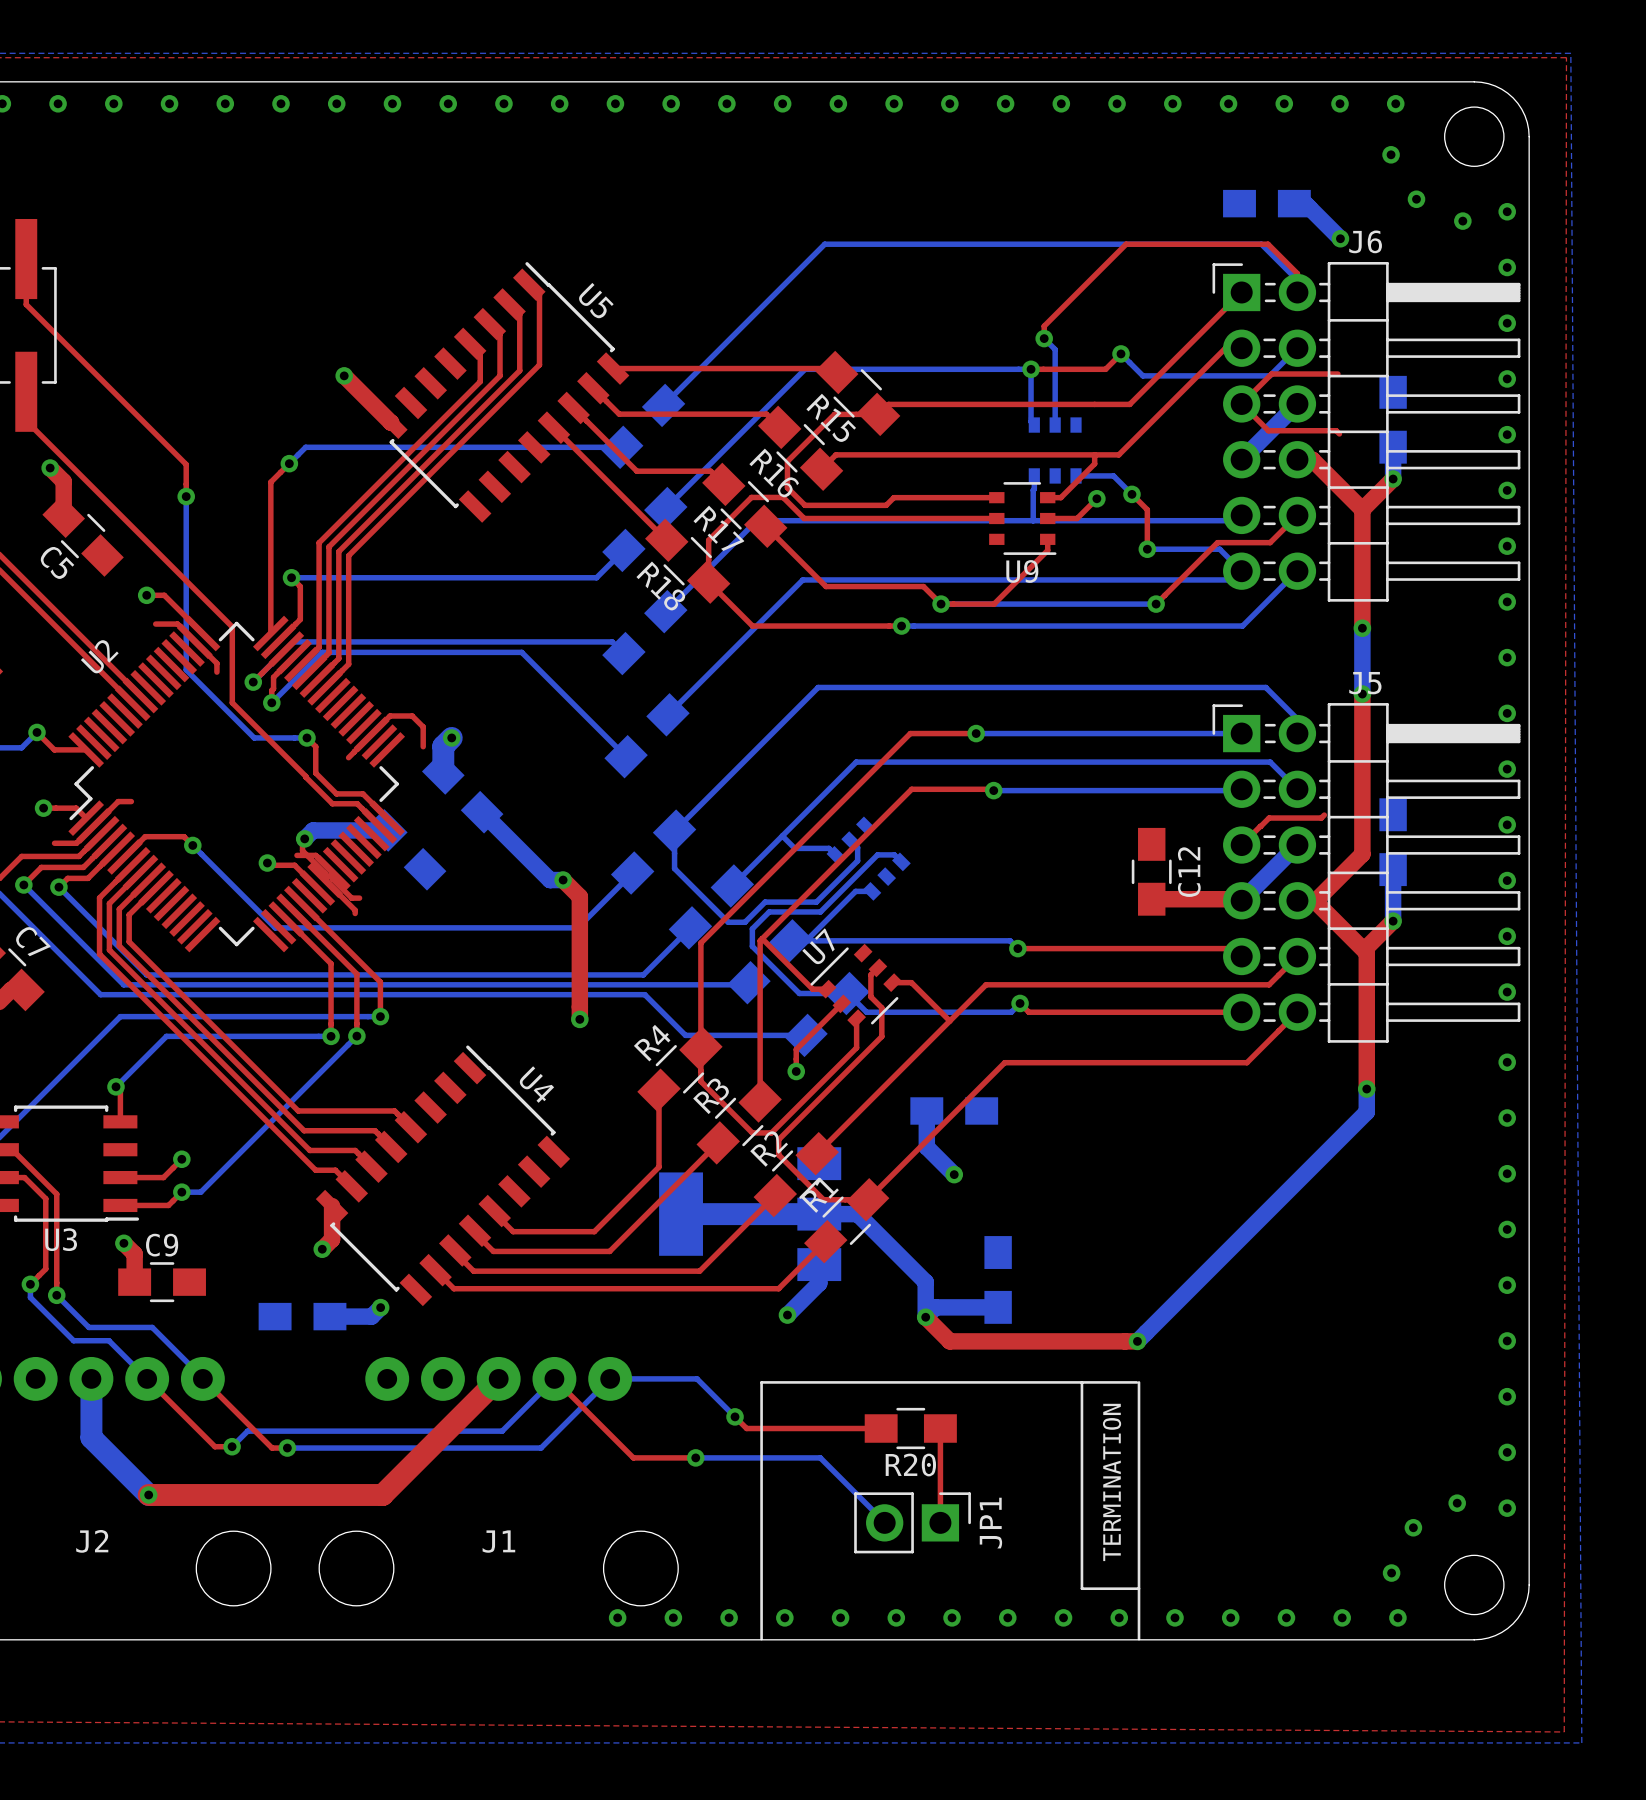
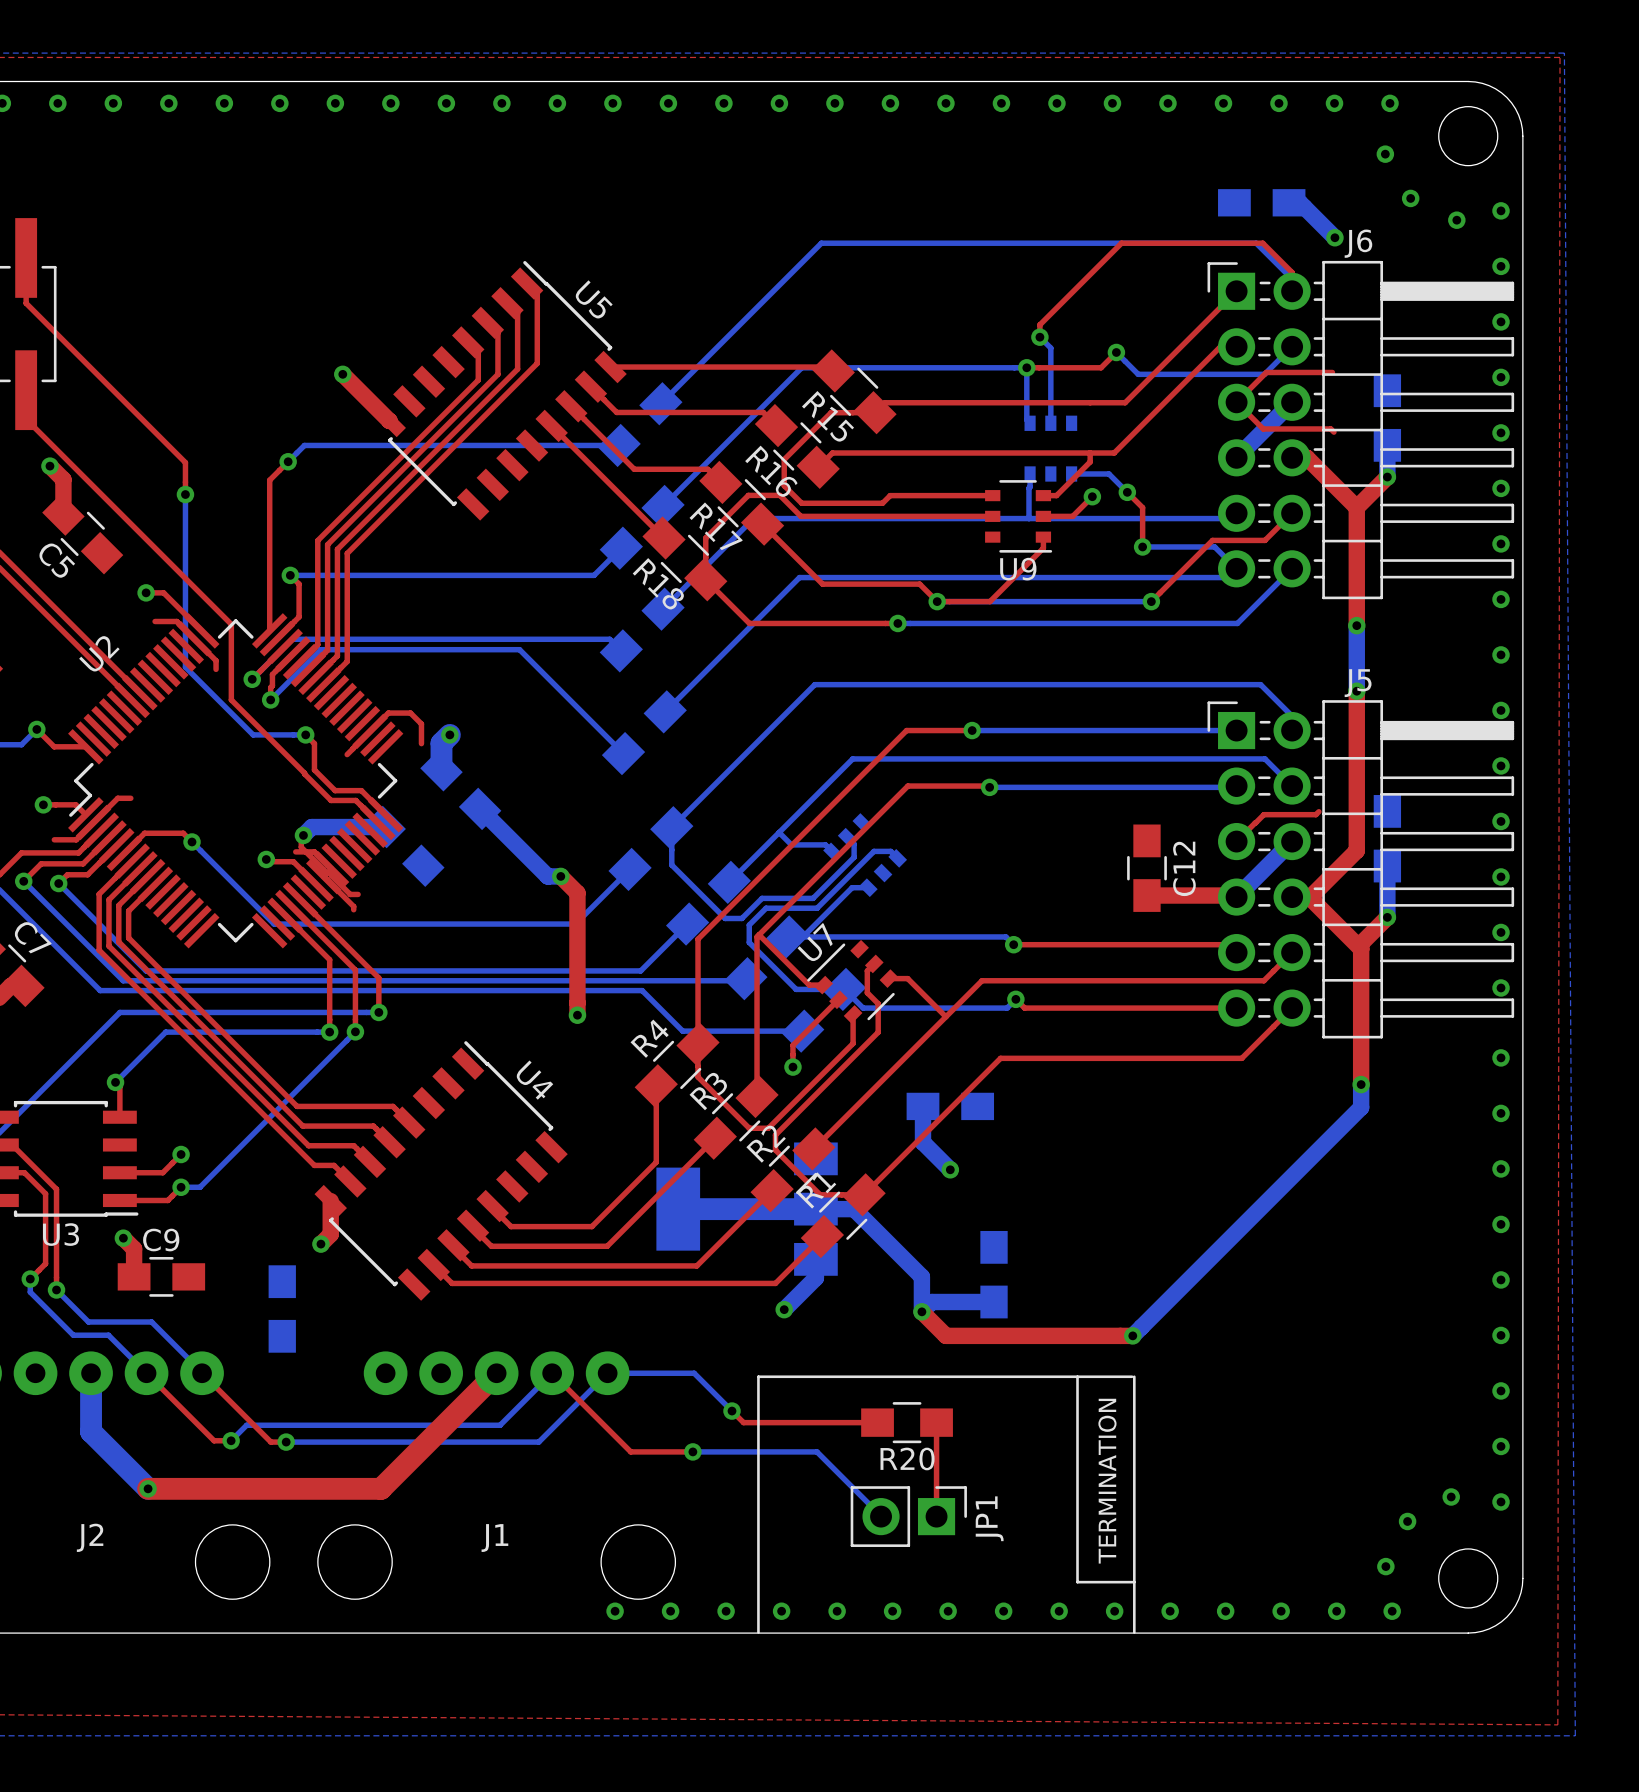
bottom track: (380, 1307) (371, 1316) (329, 1316) -> none
via: (380, 1307) -> none
part rotation: 0° (302, 1316) -> 90° clockwise (282, 1309)

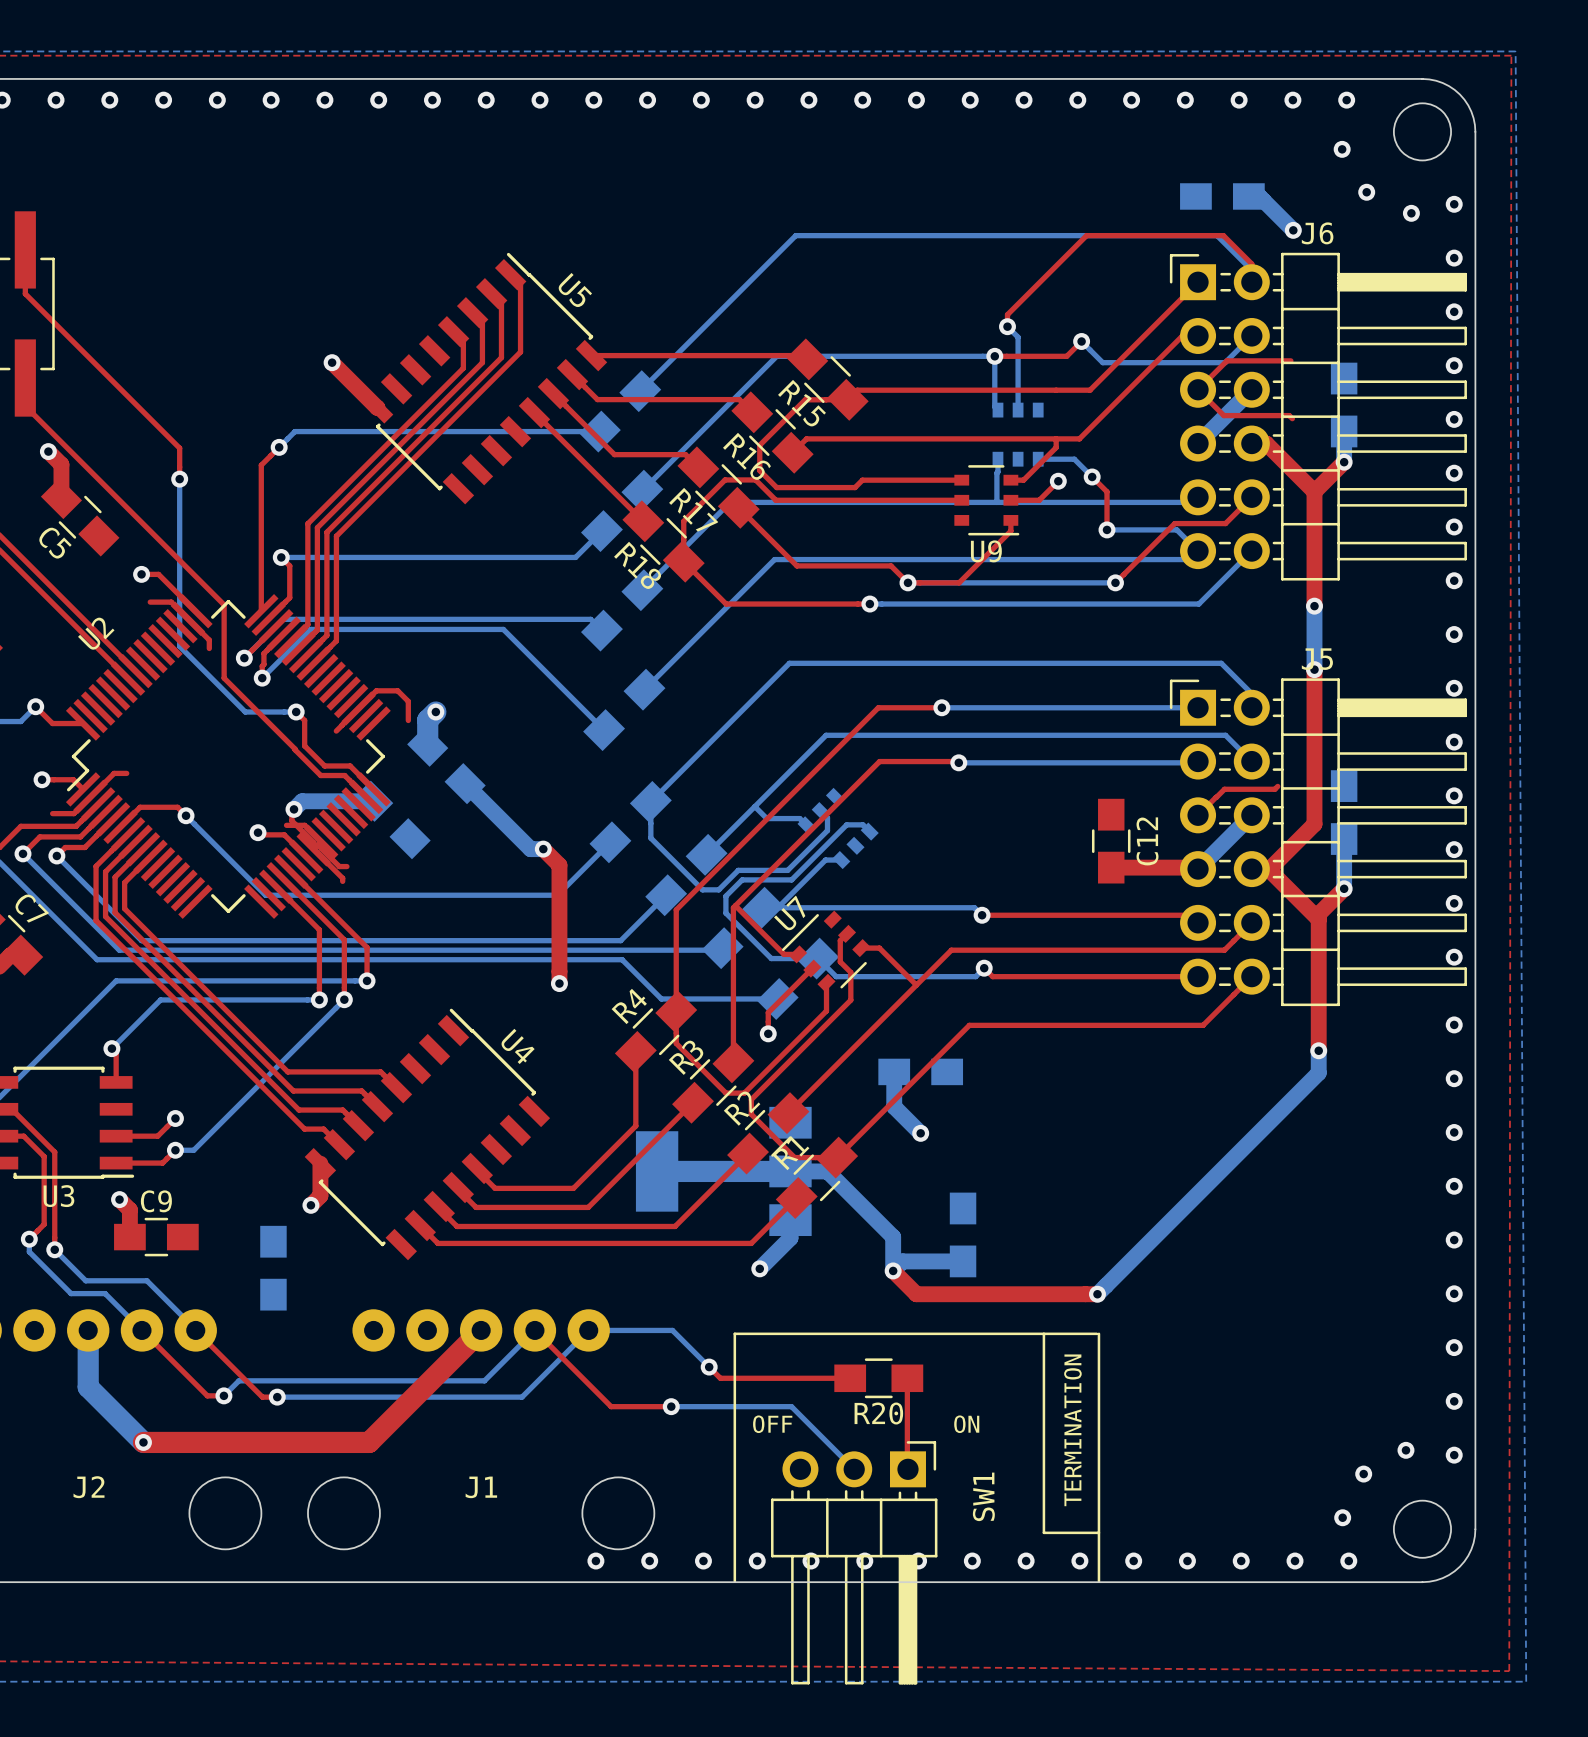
text: none -> OFF (772, 1424)
text: none -> ON (966, 1424)
JP1: (908, 1516) -> none
SW1: none -> (854, 1562)

